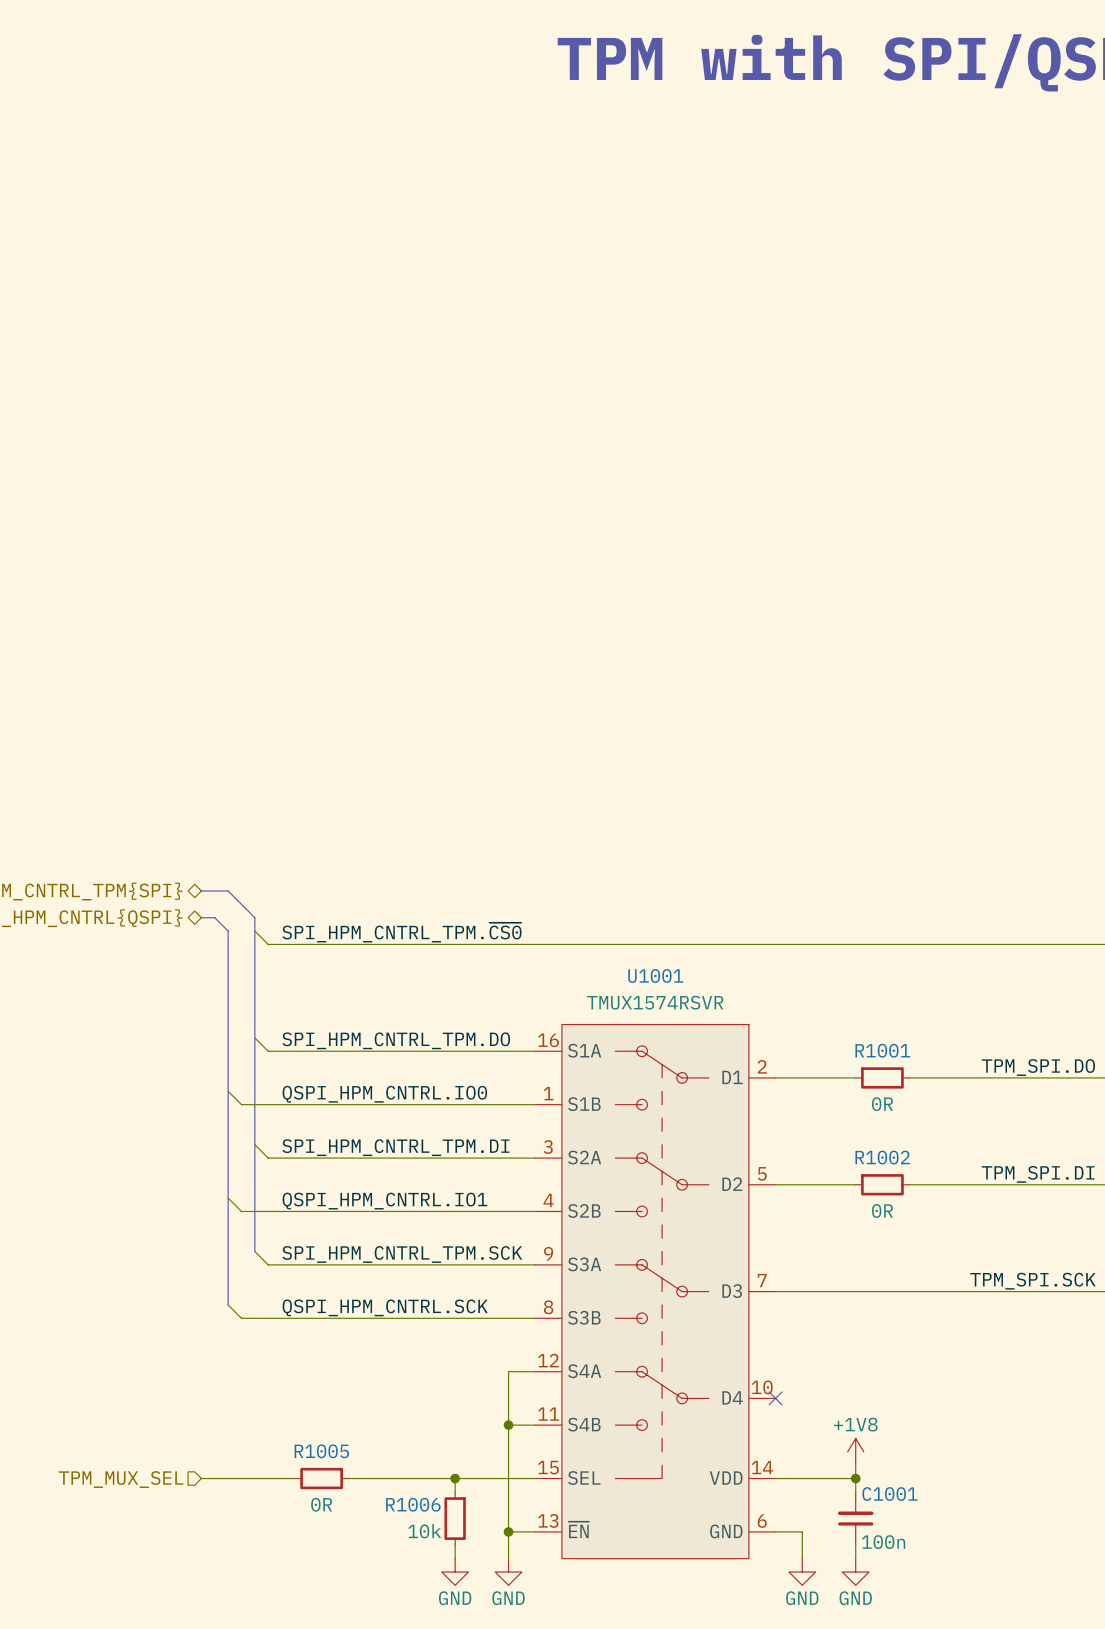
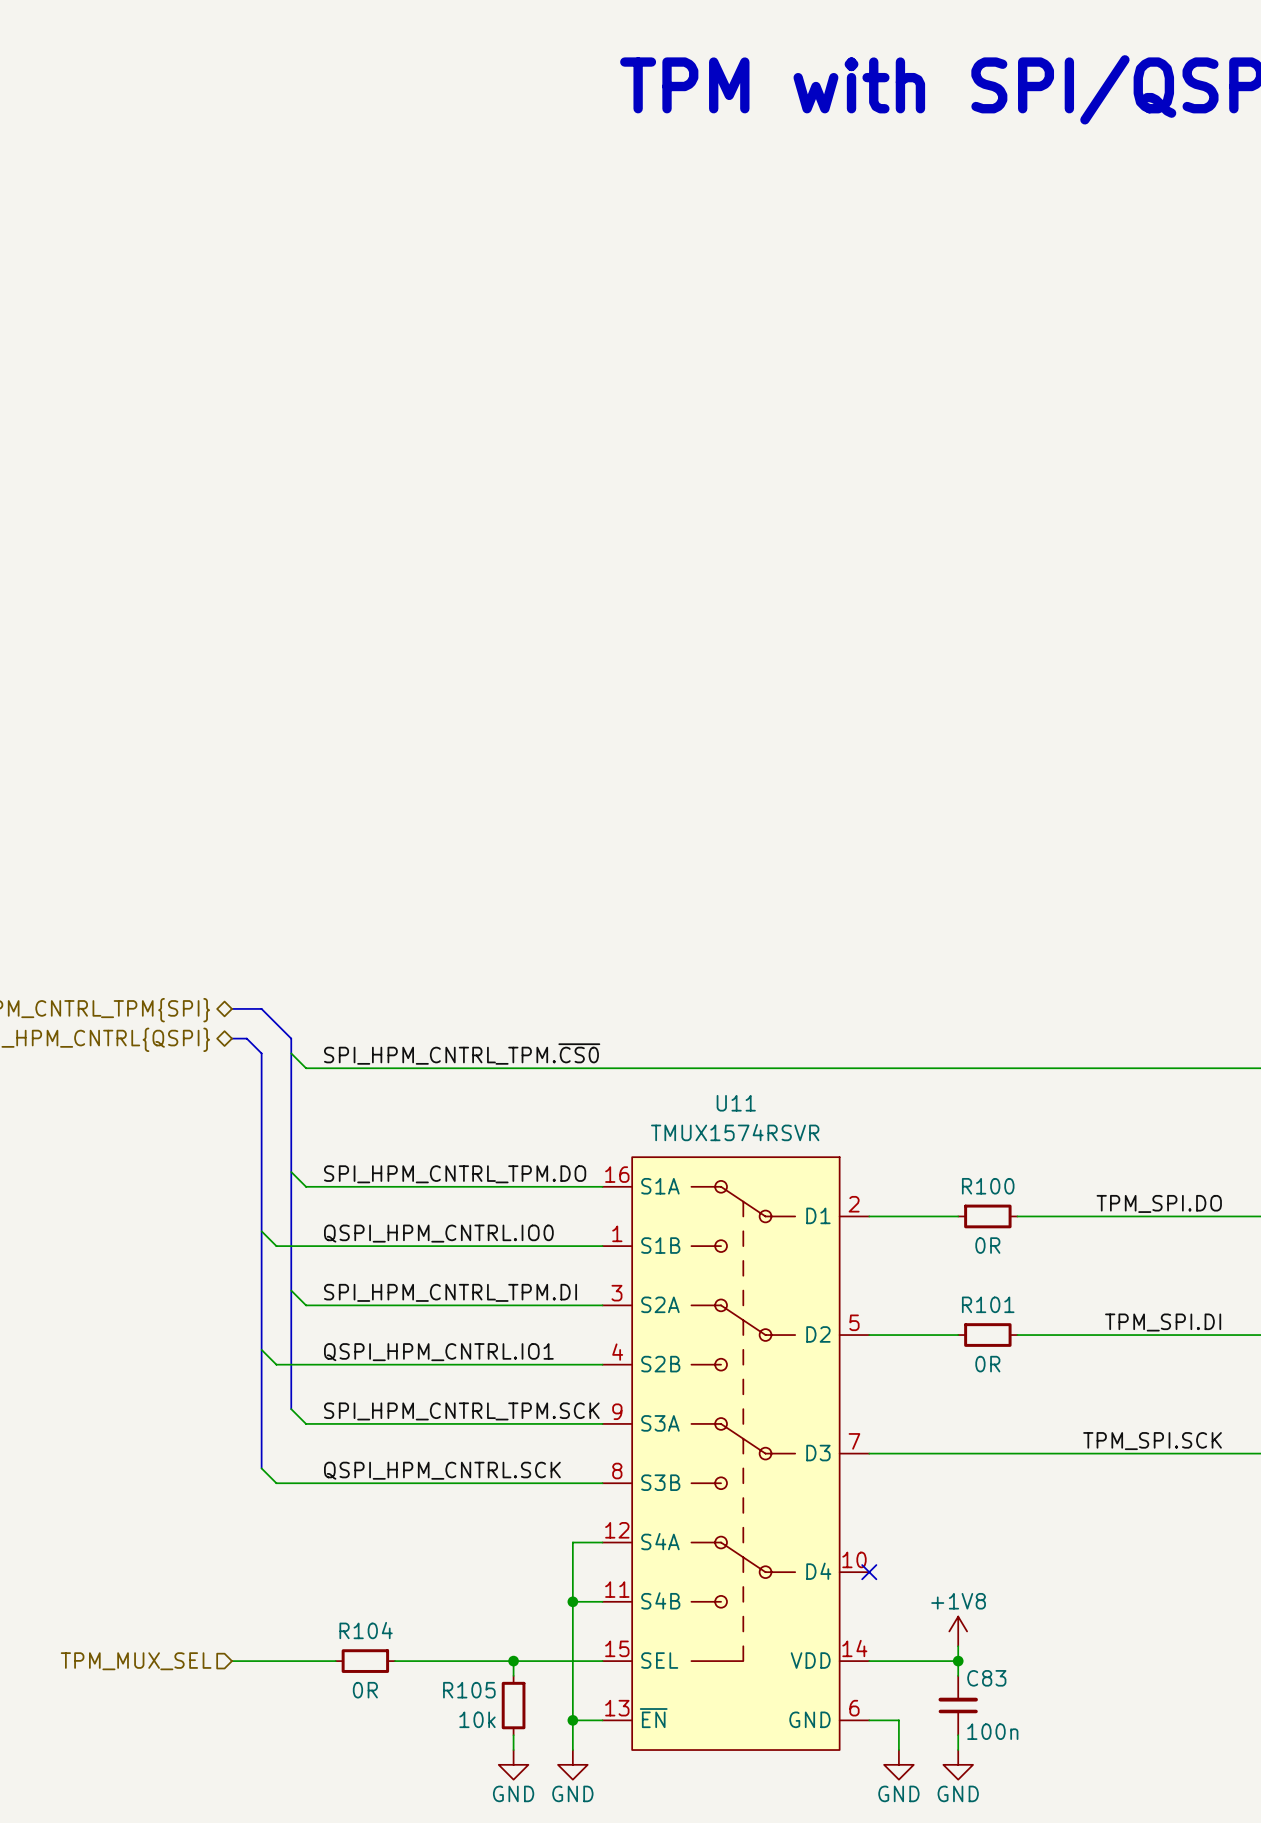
U1001 name: U1001 (655, 975) -> U11 (736, 1103)
R1001 name: R1001 (882, 1050) -> R100 (988, 1186)
R1002 name: R1002 (882, 1157) -> R101 (988, 1304)
R1005 name: R1005 (321, 1451) -> R104 (366, 1630)
C1001 name: C1001 (889, 1494) -> C83 (986, 1678)
R1006 name: R1006 (413, 1504) -> R105 (469, 1690)

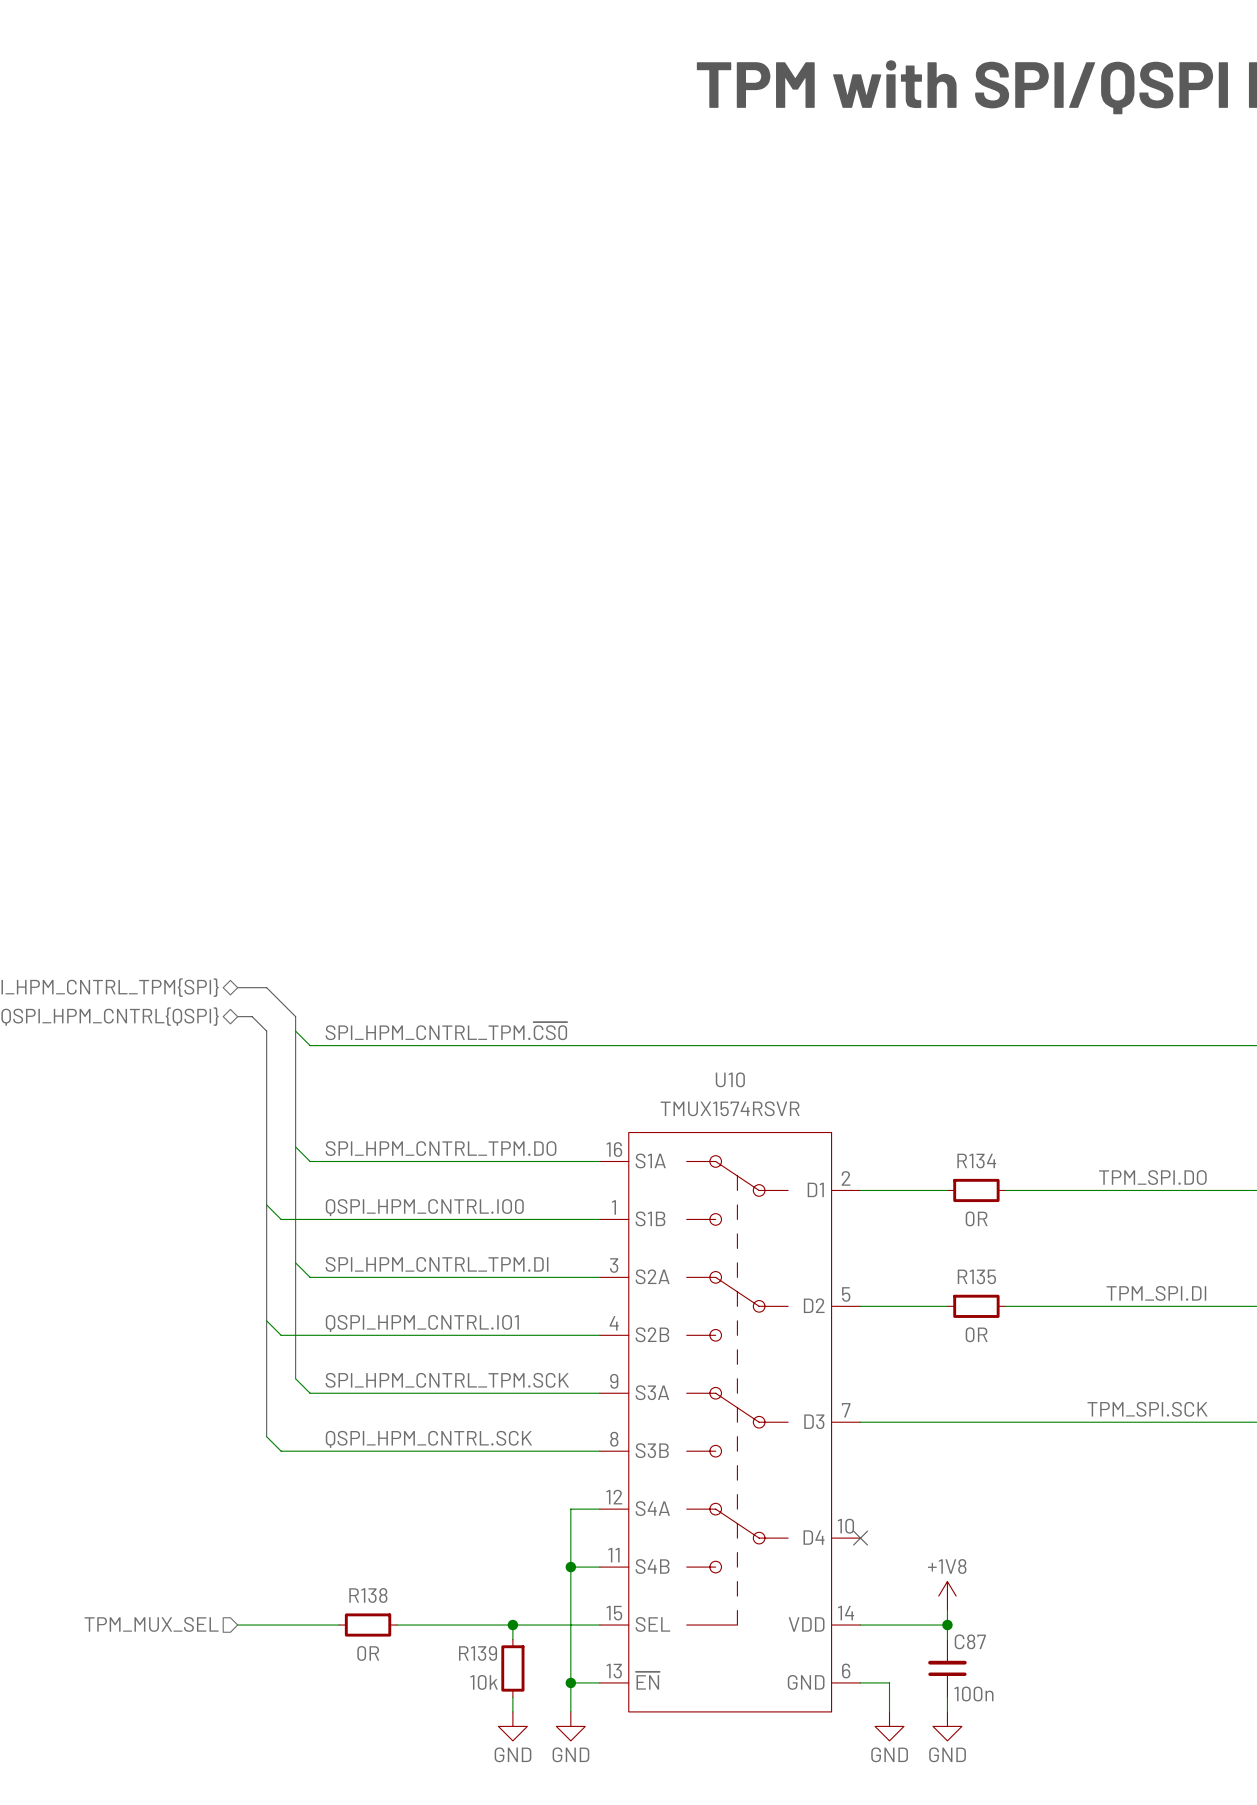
U11 name: U11 (736, 1103) -> U10 (730, 1079)
R100 name: R100 (988, 1186) -> R134 (976, 1161)
R101 name: R101 (988, 1304) -> R135 (976, 1276)
R104 name: R104 (366, 1630) -> R138 (368, 1595)
C83 name: C83 (986, 1678) -> C87 (970, 1641)
R105 name: R105 (469, 1690) -> R139 (478, 1653)

